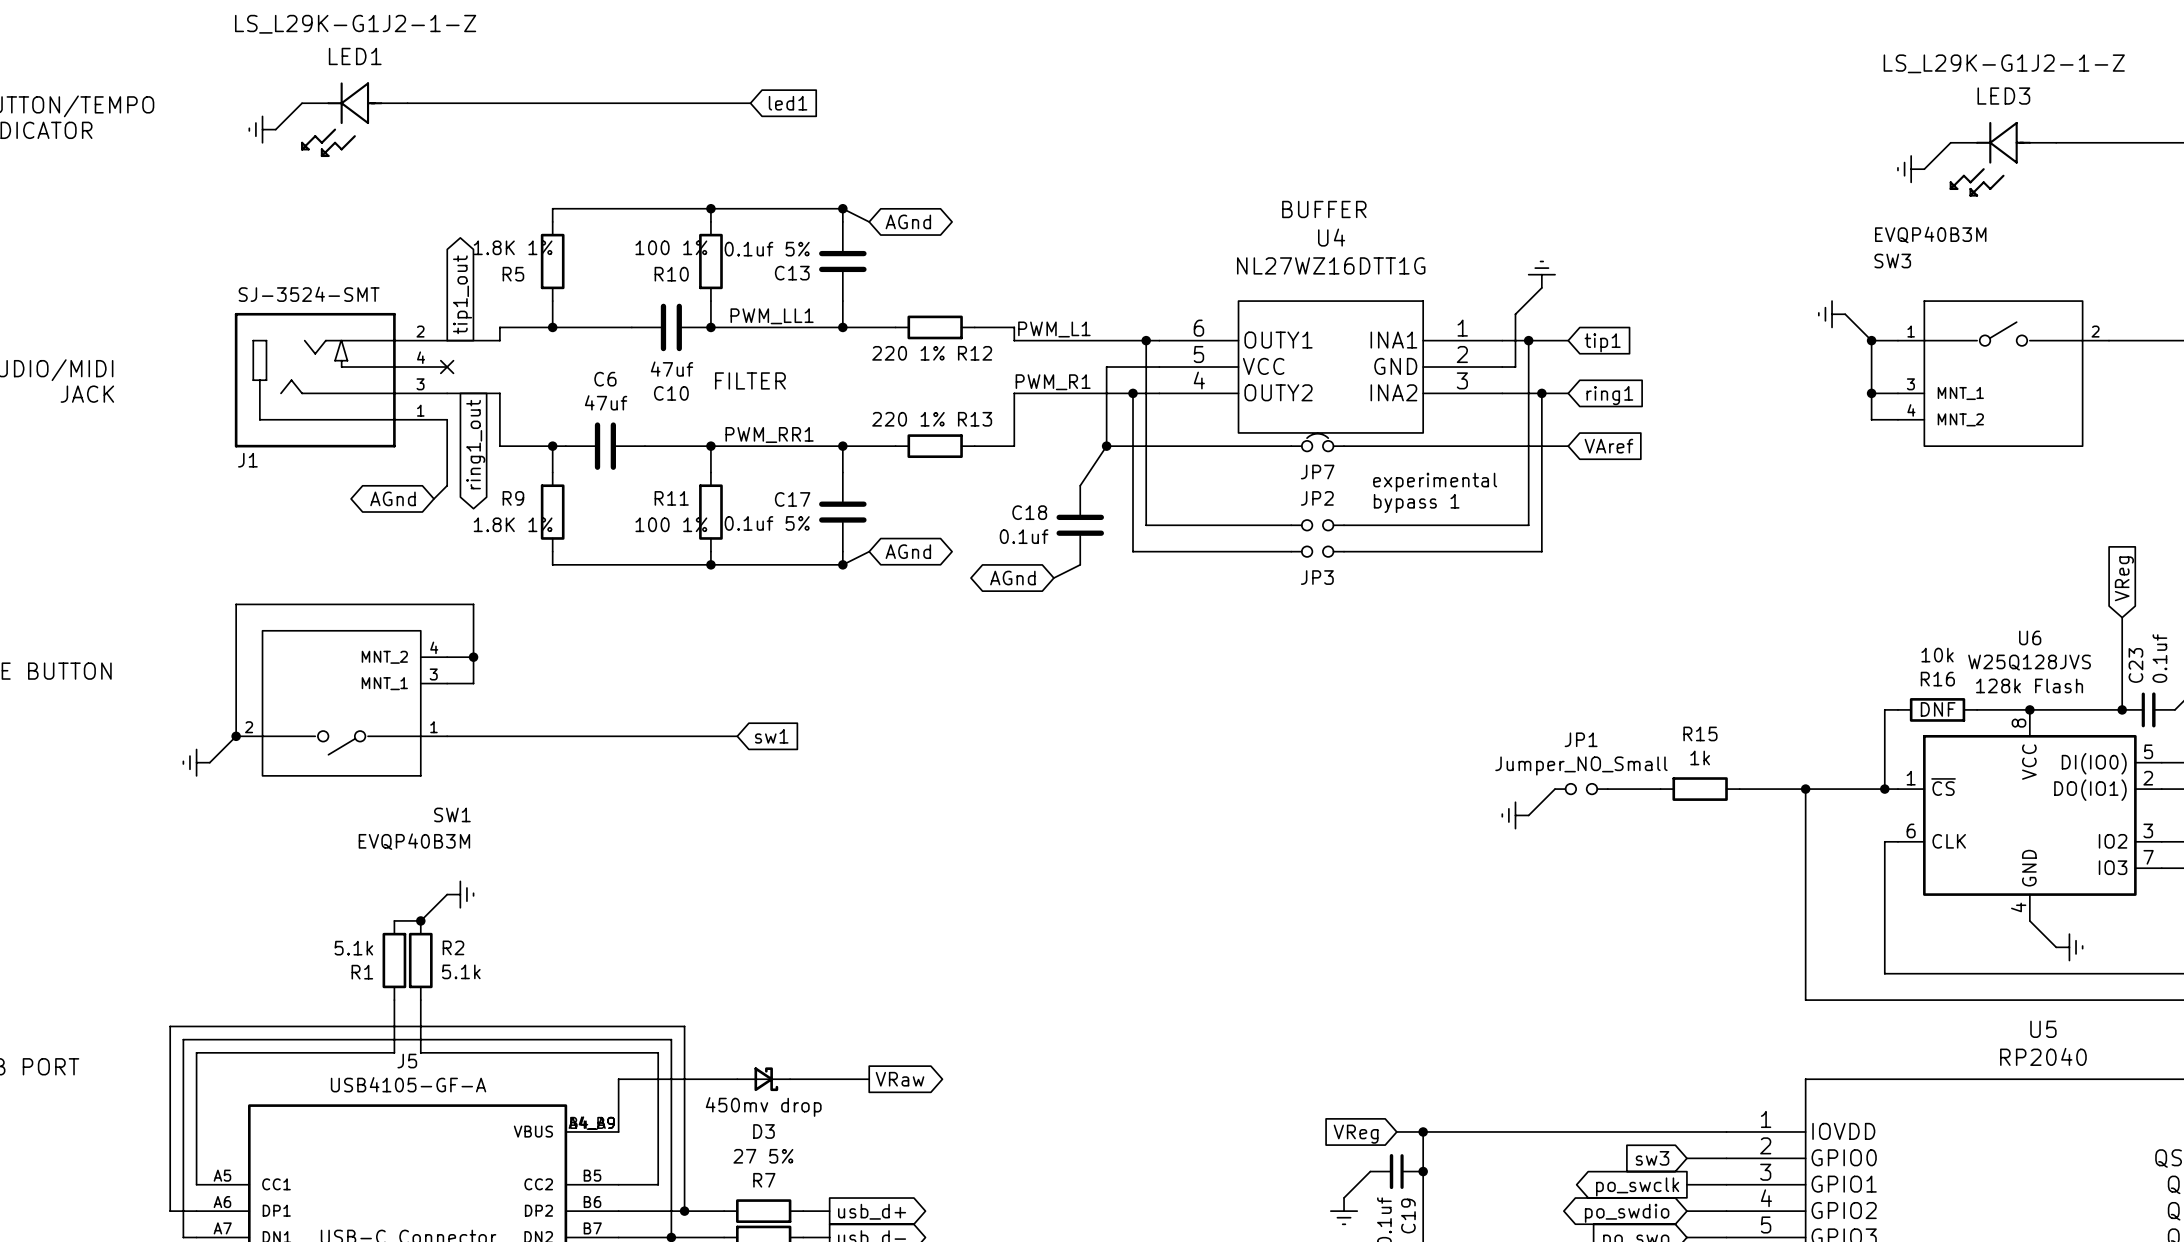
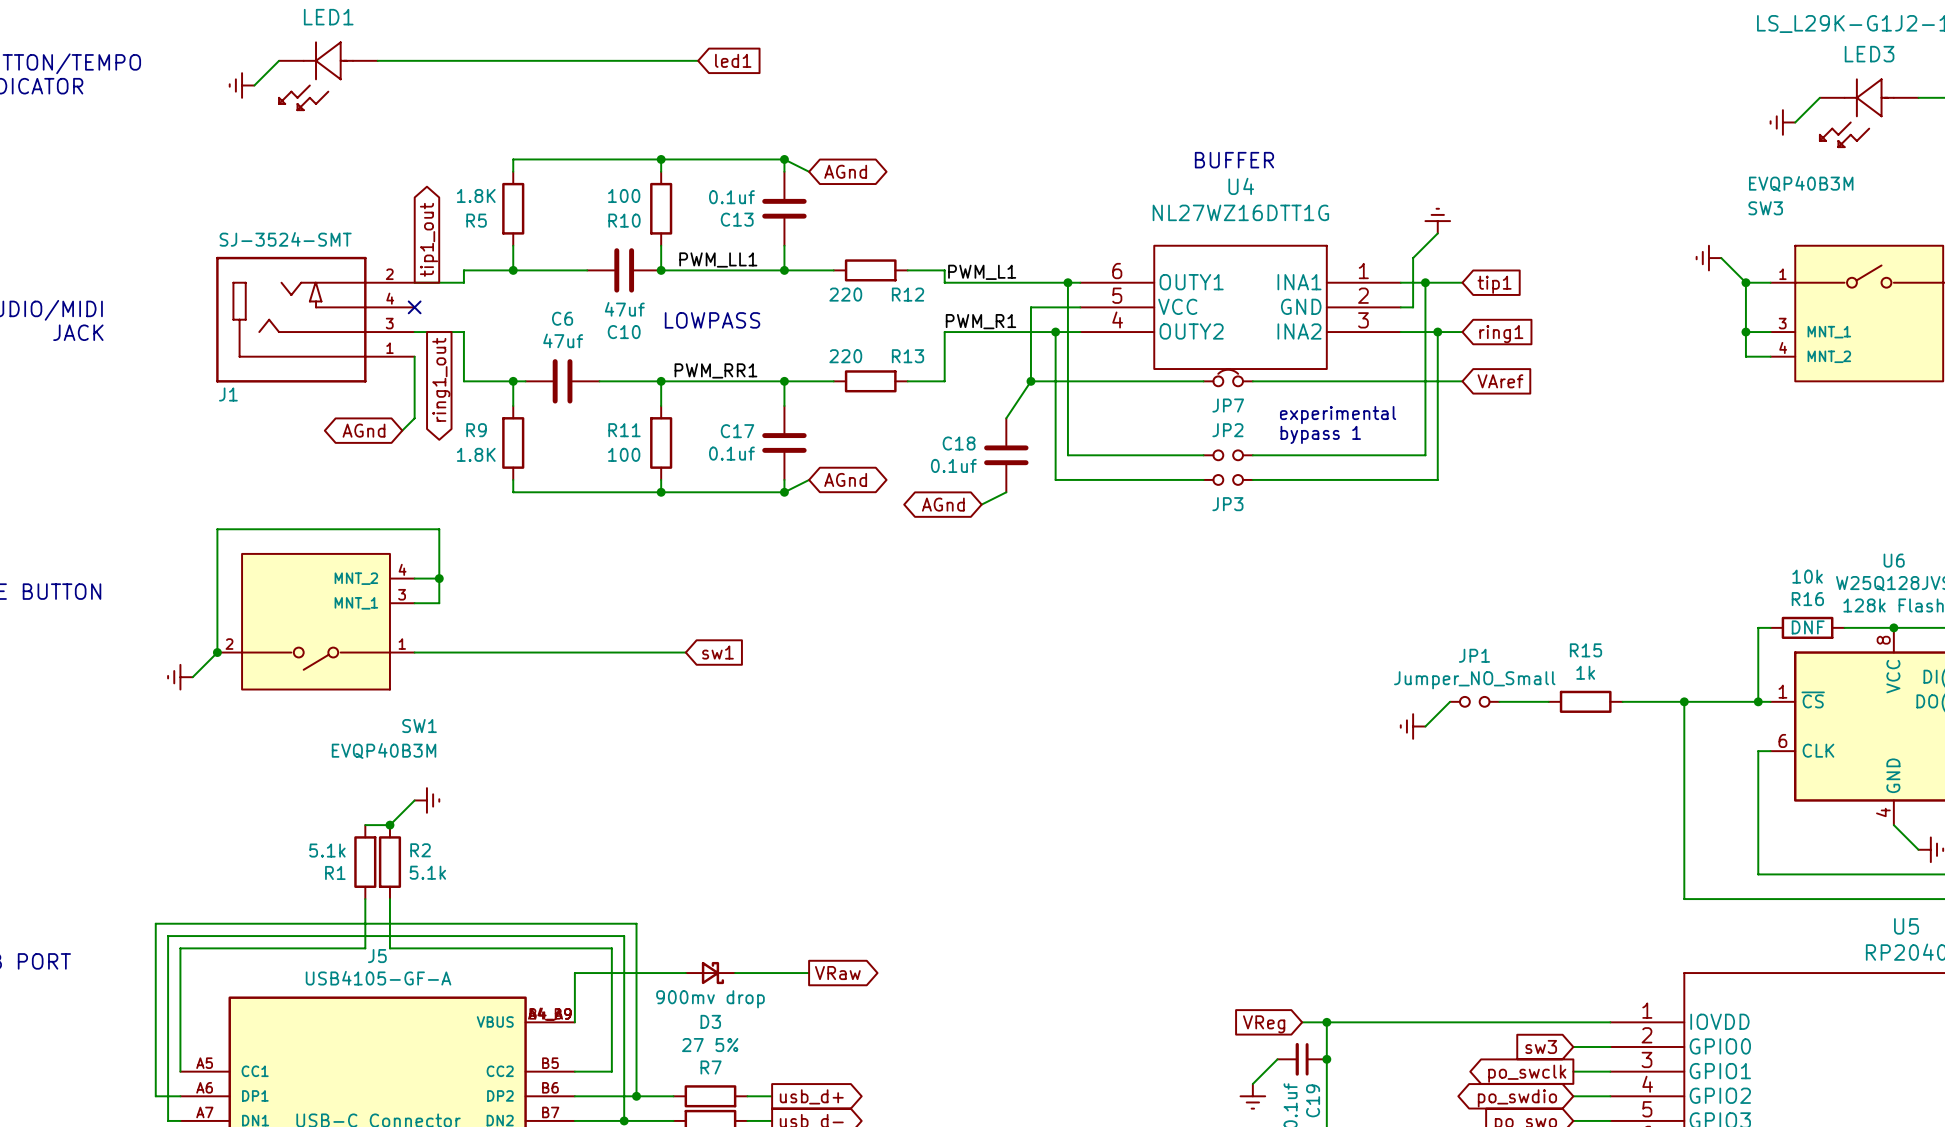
R5 value: 1.8K 1% (513, 247) -> 1.8K (476, 195)
R10 value: 100 1% (671, 247) -> 100 (624, 195)
C13 value: 0.1uf 5% (767, 249) -> 0.1uf (731, 197)
R12 value: 220 1% (908, 353) -> 220 (845, 294)
text: FILTER (750, 380) -> LOWPASS (712, 320)
R13 value: 220 1% (908, 419) -> 220 (845, 356)
C17 value: 0.1uf 5% (767, 523) -> 0.1uf (731, 453)
R9 value: 1.8K 1% (513, 524) -> 1.8K (476, 454)
R11 value: 100 1% (671, 524) -> 100 (624, 454)
D3 value: 450mv drop (763, 1106) -> 900mv drop (710, 999)

